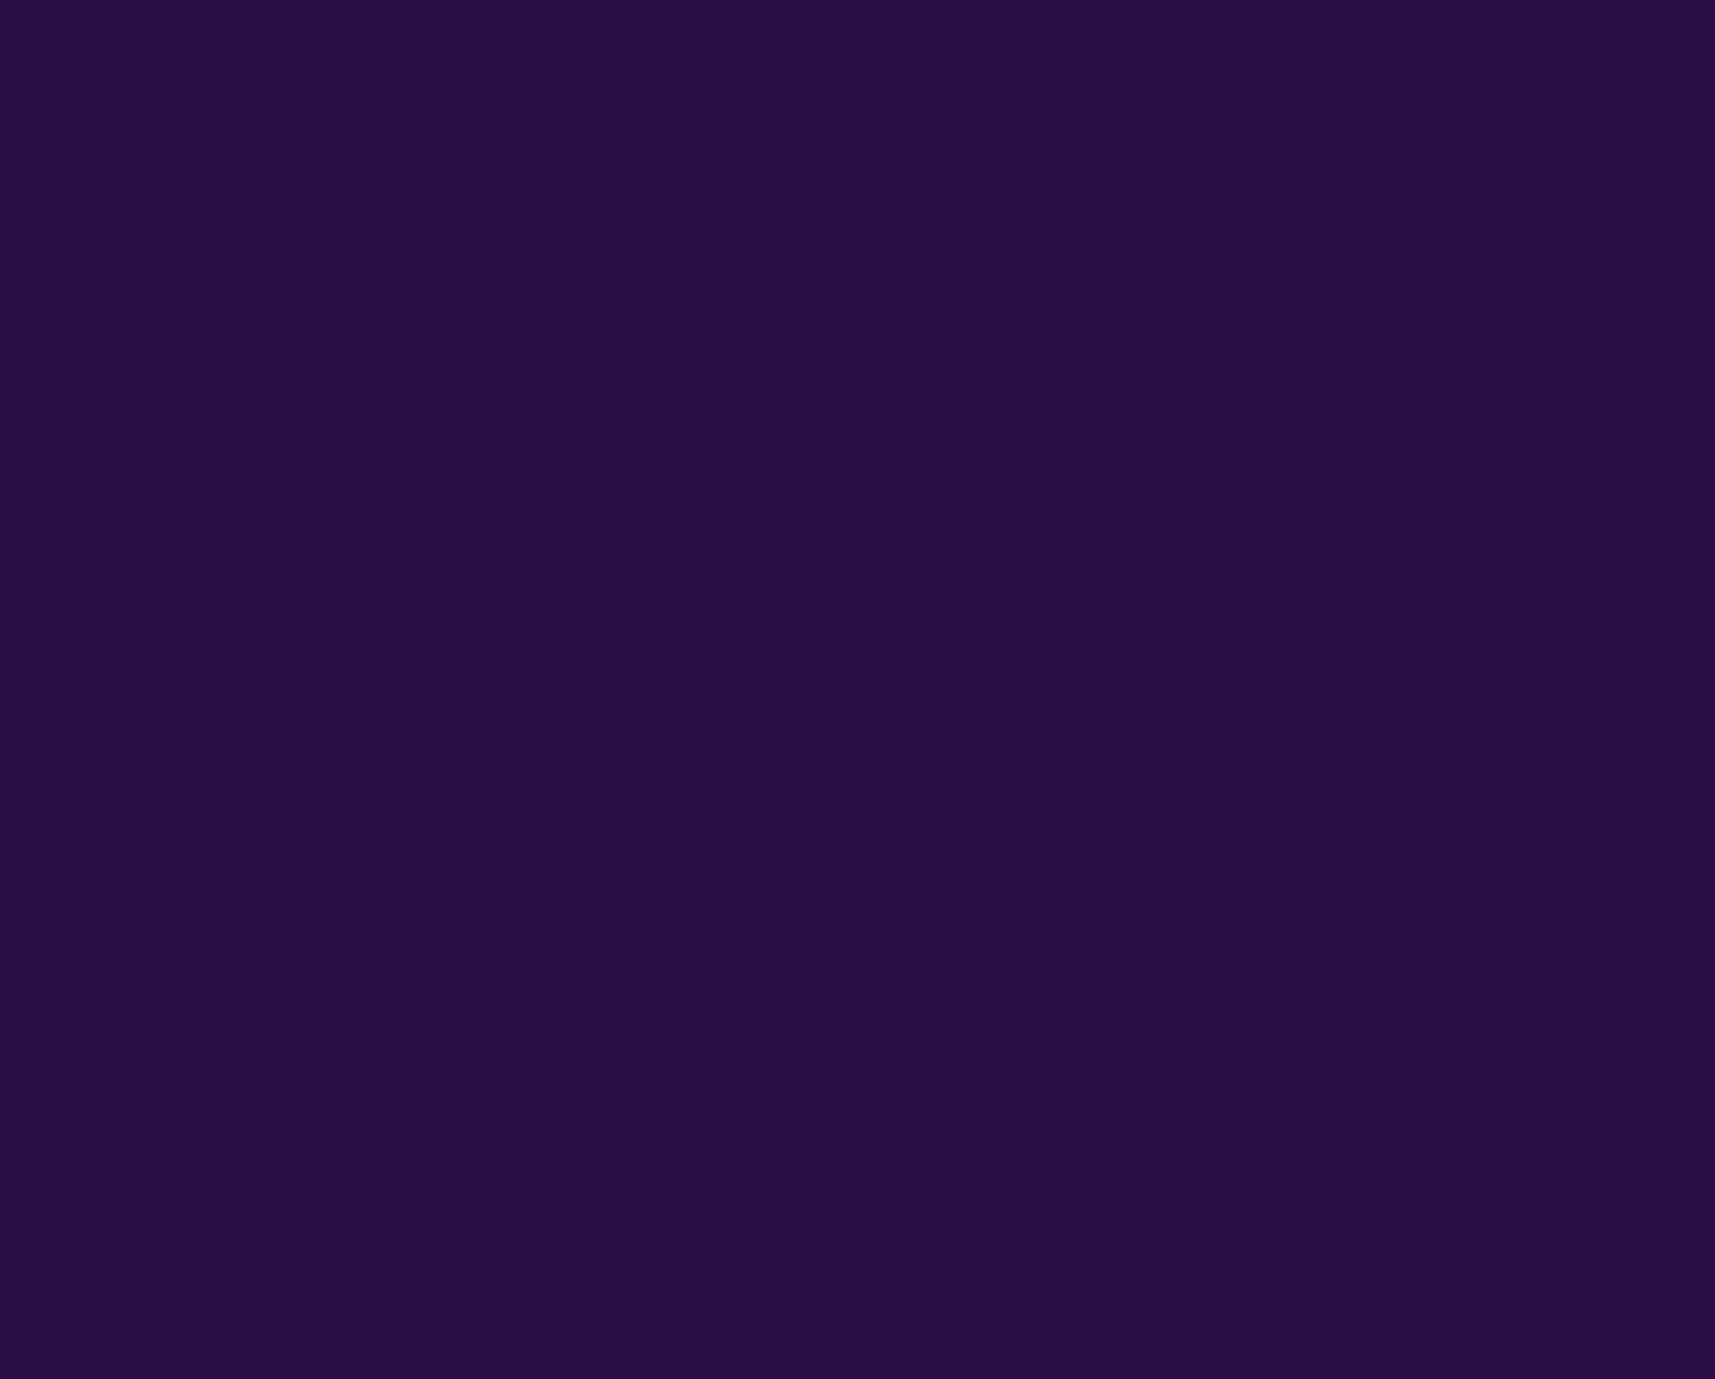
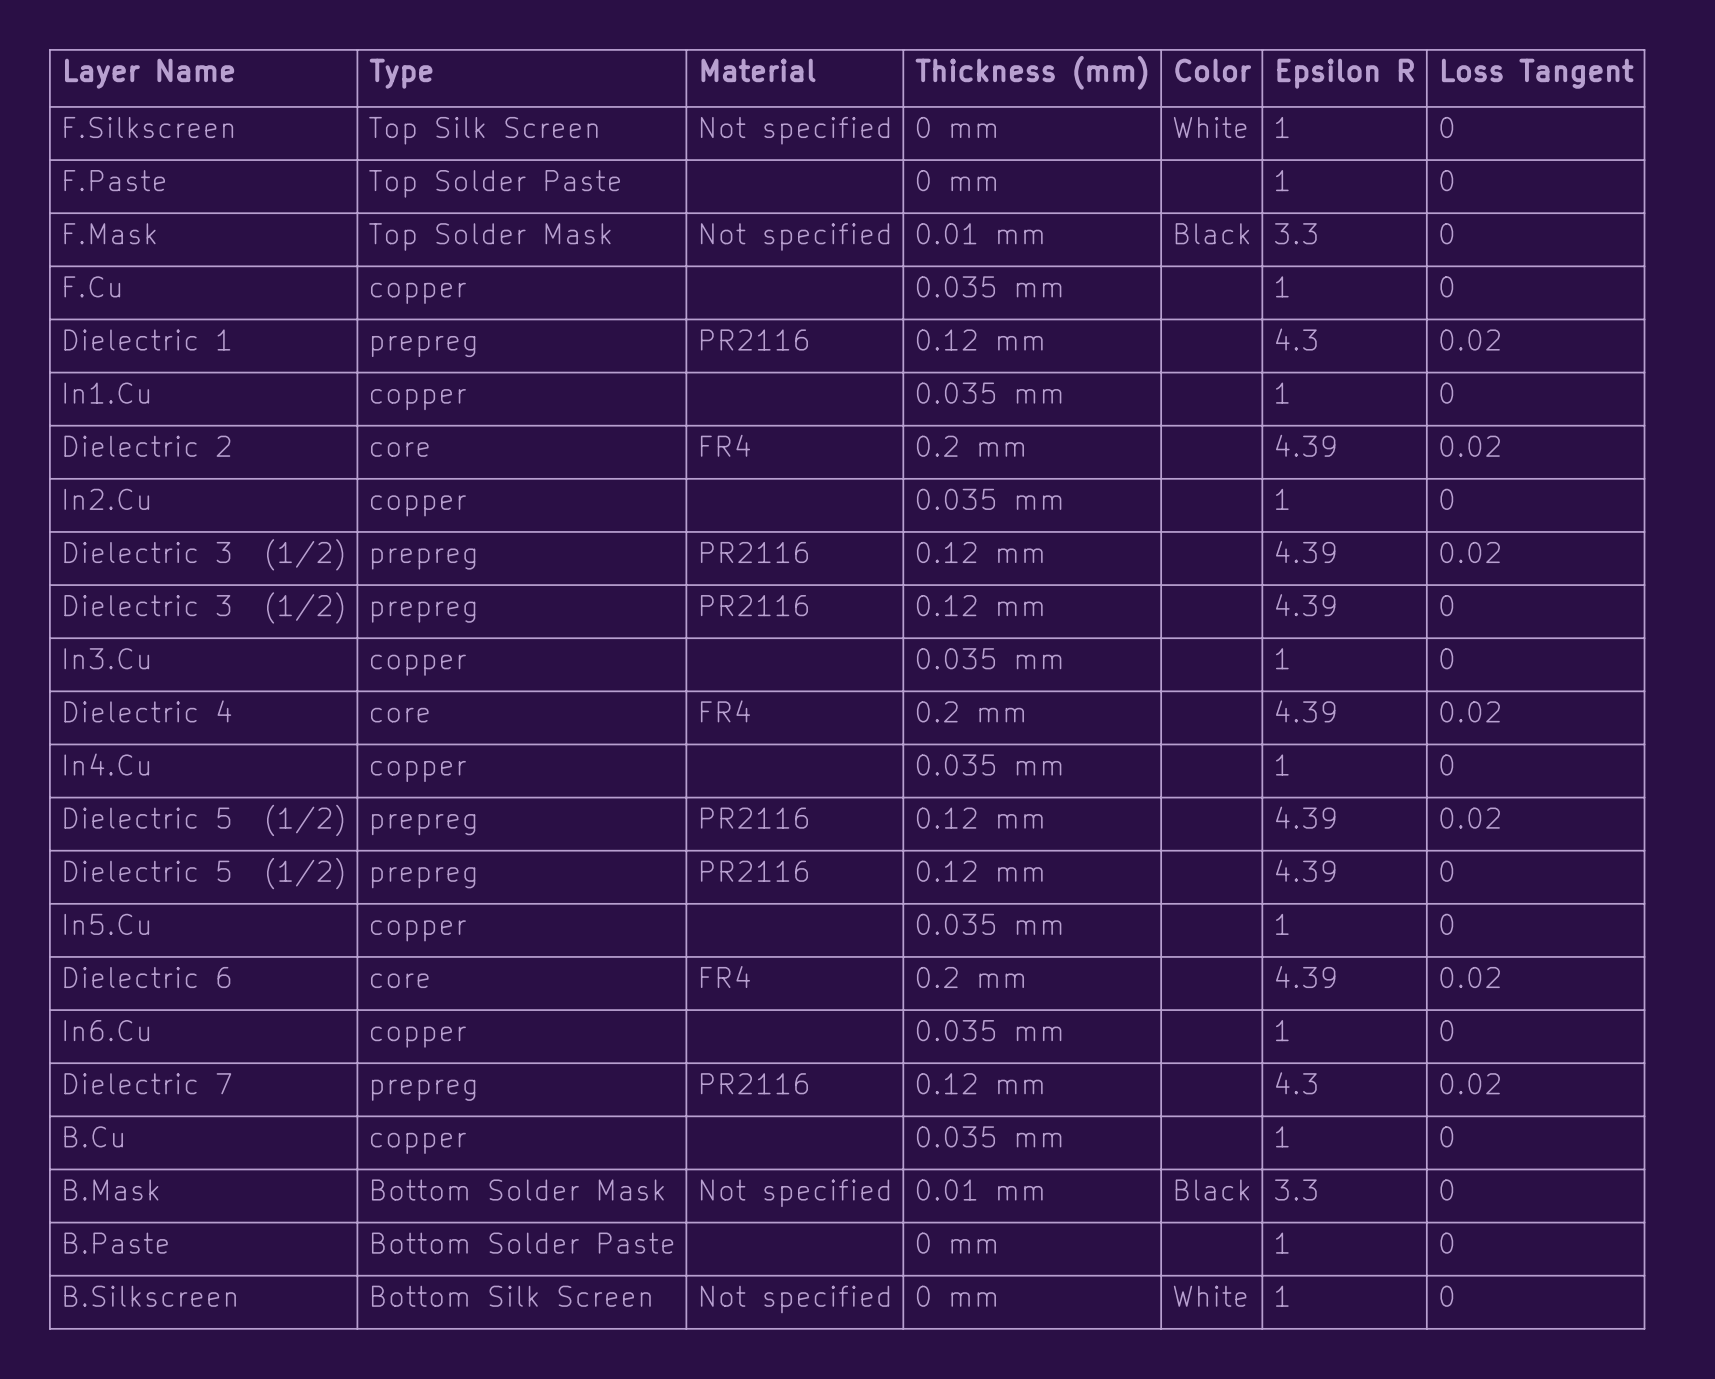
line: none -> (49, 49) (1644, 49) (1644, 1328) (49, 1328) (49, 49)
line: none -> (357, 49) (357, 1328)
line: none -> (686, 49) (686, 1328)
line: none -> (903, 49) (903, 1328)
line: none -> (1161, 49) (1161, 1328)
line: none -> (1262, 49) (1262, 1328)
line: none -> (1426, 49) (1426, 1328)
text: none -> Material (758, 70)
text: none -> Color (1213, 70)
text: none -> Thickness (mm) (1031, 72)
text: none -> Layer Name (149, 73)
text: none -> Type (401, 73)
text: none -> Epsilon R (1345, 73)
text: none -> Loss Tangent (1537, 73)
line: none -> (49, 106) (1644, 106)
text: none -> F.Silkscreen (148, 127)
text: none -> 0 mm (956, 127)
text: none -> White (1210, 127)
text: none -> 1 (1282, 127)
text: none -> 0 (1446, 127)
text: none -> Top Silk Screen (483, 130)
text: none -> Not specified (795, 130)
line: none -> (49, 160) (1644, 160)
text: none -> F.Paste (114, 180)
text: none -> 0 mm (956, 180)
text: none -> 1 (1282, 180)
text: none -> 0 (1446, 180)
text: none -> Top Solder Paste (494, 183)
line: none -> (49, 213) (1644, 213)
text: none -> F.Mask (110, 233)
text: none -> 0.01 mm (979, 233)
text: none -> Black (1212, 233)
text: none -> 3.3 (1295, 233)
text: none -> 0 (1446, 233)
text: none -> Top Solder Mask (489, 237)
text: none -> Not specified (795, 237)
line: none -> (49, 266) (1644, 266)
text: none -> F.Cu (92, 286)
text: none -> 0.035 mm (989, 286)
text: none -> 1 (1282, 286)
text: none -> 0 (1446, 286)
text: none -> copper (418, 293)
line: none -> (49, 319) (1644, 319)
text: none -> Dielectric 1 (147, 339)
text: none -> PR2116 (754, 339)
text: none -> 0.12 mm (979, 339)
text: none -> 4.3 (1296, 339)
text: none -> 0.02 (1470, 339)
text: none -> prepreg (423, 346)
line: none -> (49, 372) (1644, 372)
text: none -> In1.Cu (106, 393)
text: none -> 0.035 mm (989, 393)
text: none -> 1 (1282, 393)
text: none -> 0 (1446, 393)
text: none -> copper (418, 399)
line: none -> (49, 425) (1644, 425)
text: none -> FR4 (725, 445)
text: none -> 4.39 (1305, 445)
text: none -> Dielectric 2 (147, 446)
text: none -> 0.2 mm (970, 446)
text: none -> 0.02 (1470, 446)
text: none -> core (399, 449)
line: none -> (49, 478) (1644, 478)
text: none -> In2.Cu (106, 499)
text: none -> 0.035 mm (989, 499)
text: none -> 1 (1282, 499)
text: none -> 0 (1446, 499)
text: none -> copper (418, 505)
line: none -> (49, 531) (1644, 531)
text: none -> PR2116 (754, 552)
text: none -> 0.12 mm (979, 552)
text: none -> 4.39 (1305, 552)
text: none -> 0.02 (1470, 552)
text: none -> Dielectric 3 (1/2) (203, 554)
text: none -> prepreg (423, 559)
line: none -> (49, 585) (1644, 585)
text: none -> PR2116 (754, 605)
text: none -> 0.12 mm (979, 605)
text: none -> 4.39 (1305, 605)
text: none -> 0 (1446, 605)
text: none -> Dielectric 3 (1/2) (203, 607)
text: none -> prepreg (423, 612)
line: none -> (49, 638) (1644, 638)
text: none -> In3.Cu (106, 658)
text: none -> 0.035 mm (989, 658)
text: none -> 1 (1282, 658)
text: none -> 0 (1446, 658)
text: none -> copper (418, 665)
line: none -> (49, 691) (1644, 691)
text: none -> Dielectric 4 (147, 711)
text: none -> FR4 (725, 711)
text: none -> 0.2 mm (970, 711)
text: none -> 4.39 (1305, 711)
text: none -> 0.02 (1470, 711)
text: none -> core (399, 715)
line: none -> (49, 744) (1644, 744)
text: none -> In4.Cu (106, 764)
text: none -> 0.035 mm (989, 764)
text: none -> 1 (1282, 764)
text: none -> 0 (1446, 764)
text: none -> copper (418, 771)
line: none -> (49, 797) (1644, 797)
text: none -> 4.39 (1305, 817)
text: none -> PR2116 (754, 818)
text: none -> 0.12 mm (979, 818)
text: none -> 0.02 (1470, 818)
text: none -> Dielectric 5 (1/2) (203, 820)
text: none -> prepreg (423, 824)
line: none -> (49, 850) (1644, 850)
text: none -> 4.39 (1305, 870)
text: none -> PR2116 (754, 871)
text: none -> 0.12 mm (979, 871)
text: none -> 0 (1446, 871)
text: none -> Dielectric 5 (1/2) (203, 873)
text: none -> prepreg (423, 877)
line: none -> (49, 903) (1644, 903)
text: none -> In5.Cu (106, 924)
text: none -> 0.035 mm (989, 924)
text: none -> 1 (1282, 924)
text: none -> 0 (1446, 924)
text: none -> copper (418, 930)
line: none -> (49, 956) (1644, 956)
text: none -> Dielectric 6 (147, 977)
text: none -> FR4 (725, 977)
text: none -> 0.2 mm (970, 977)
text: none -> 4.39 (1305, 977)
text: none -> 0.02 (1470, 977)
text: none -> core (399, 980)
line: none -> (49, 1010) (1644, 1010)
text: none -> In6.Cu (106, 1030)
text: none -> 0.035 mm (989, 1030)
text: none -> 1 (1282, 1030)
text: none -> 0 (1446, 1030)
text: none -> copper (418, 1037)
line: none -> (49, 1063) (1644, 1063)
text: none -> Dielectric 7 (147, 1083)
text: none -> PR2116 (754, 1083)
text: none -> 0.12 mm (979, 1083)
text: none -> 4.3 (1296, 1083)
text: none -> 0.02 (1470, 1083)
text: none -> prepreg (423, 1090)
line: none -> (49, 1116) (1644, 1116)
text: none -> B.Cu (93, 1136)
text: none -> 0.035 mm (989, 1136)
text: none -> 1 (1282, 1136)
text: none -> 0 (1446, 1136)
text: none -> copper (418, 1143)
line: none -> (49, 1169) (1644, 1169)
text: none -> B.Mask (111, 1189)
text: none -> Bottom Solder Mask (517, 1189)
text: none -> 0.01 mm (979, 1189)
text: none -> Black (1212, 1189)
text: none -> 3.3 (1295, 1189)
text: none -> 0 (1446, 1189)
text: none -> Not specified (795, 1193)
line: none -> (49, 1222) (1644, 1222)
text: none -> B.Paste (116, 1243)
text: none -> Bottom Solder Paste (522, 1243)
text: none -> 0 mm (956, 1243)
text: none -> 1 (1282, 1243)
text: none -> 0 (1446, 1243)
line: none -> (49, 1275) (1644, 1275)
text: none -> B.Silkscreen (150, 1296)
text: none -> Bottom Silk Screen (511, 1296)
text: none -> 0 mm (956, 1296)
text: none -> White (1210, 1296)
text: none -> 1 (1282, 1296)
text: none -> 0 (1446, 1296)
text: none -> Not specified (795, 1299)

